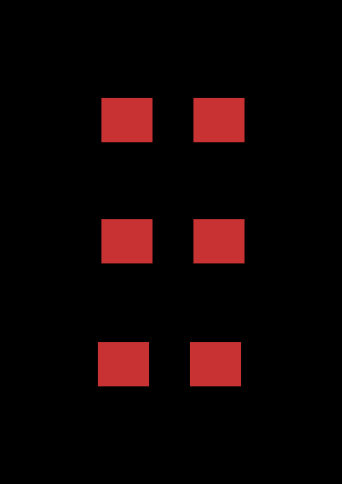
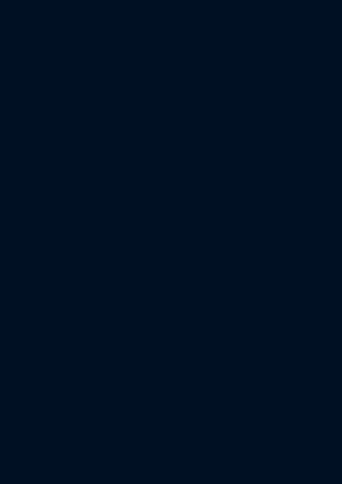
part: (172, 120) -> none
part: (172, 241) -> none
part: (169, 364) -> none

